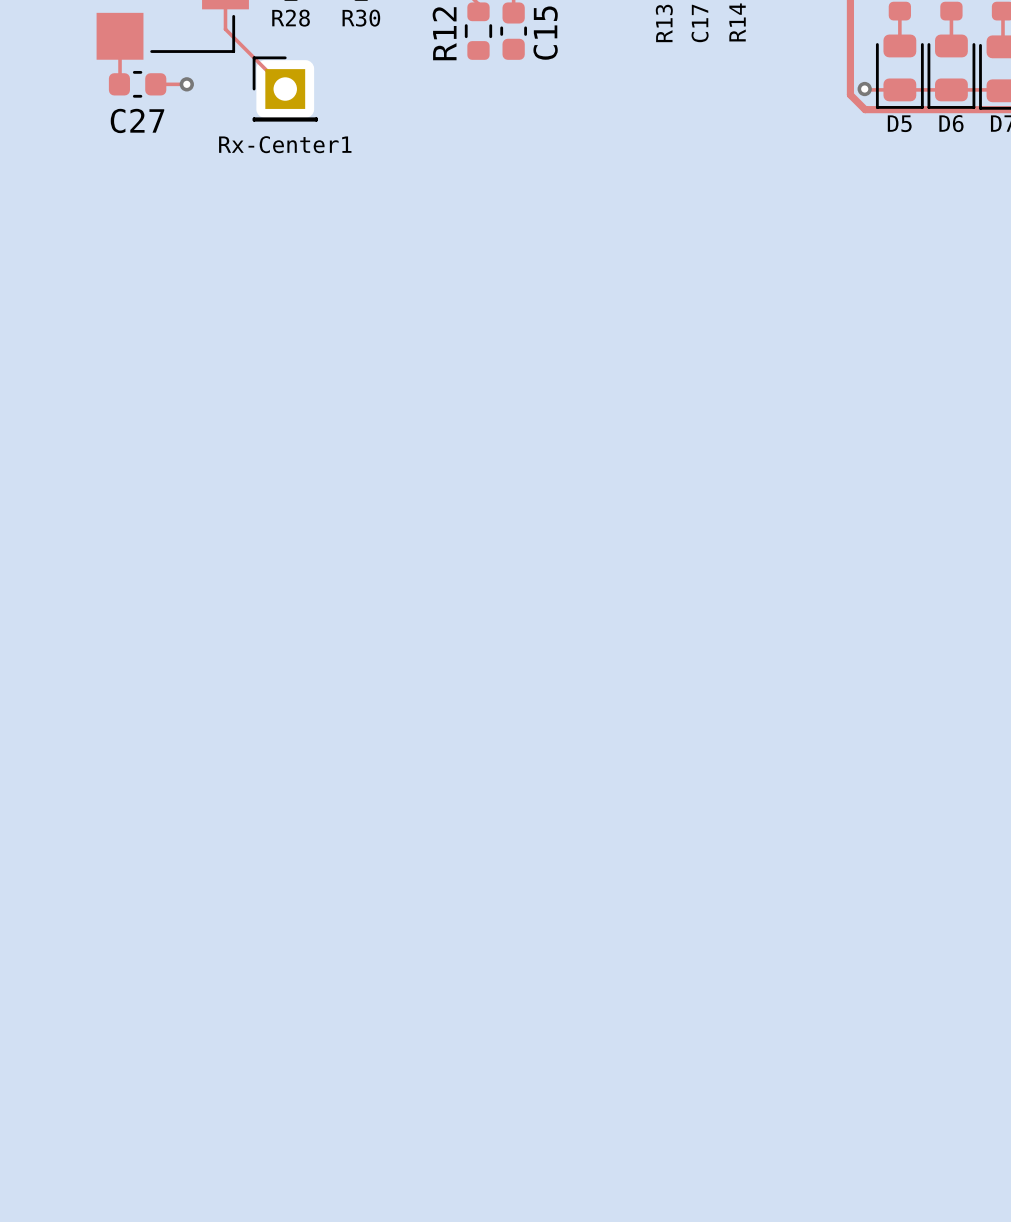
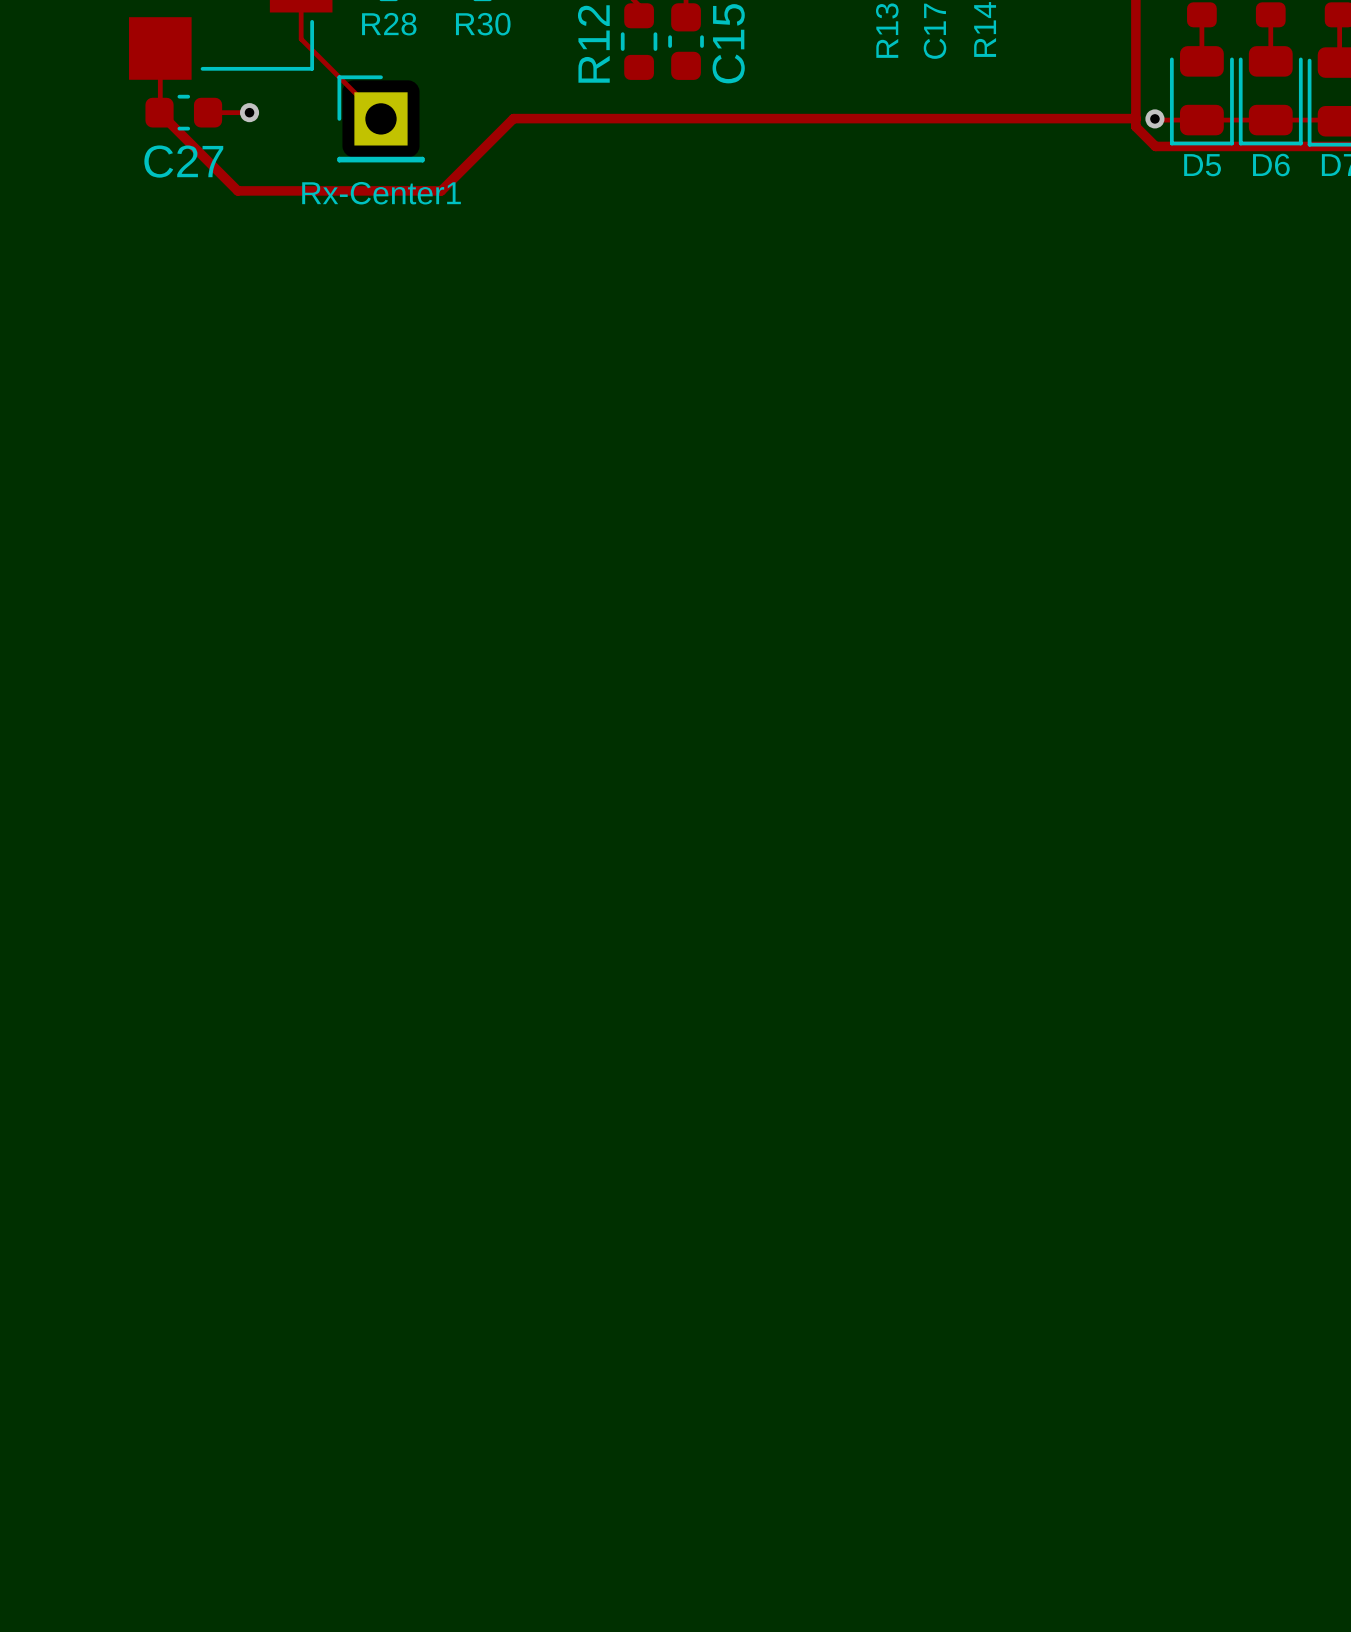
top track: none -> (159, 112) (237, 190) (441, 190) (513, 118) (1135, 118)

